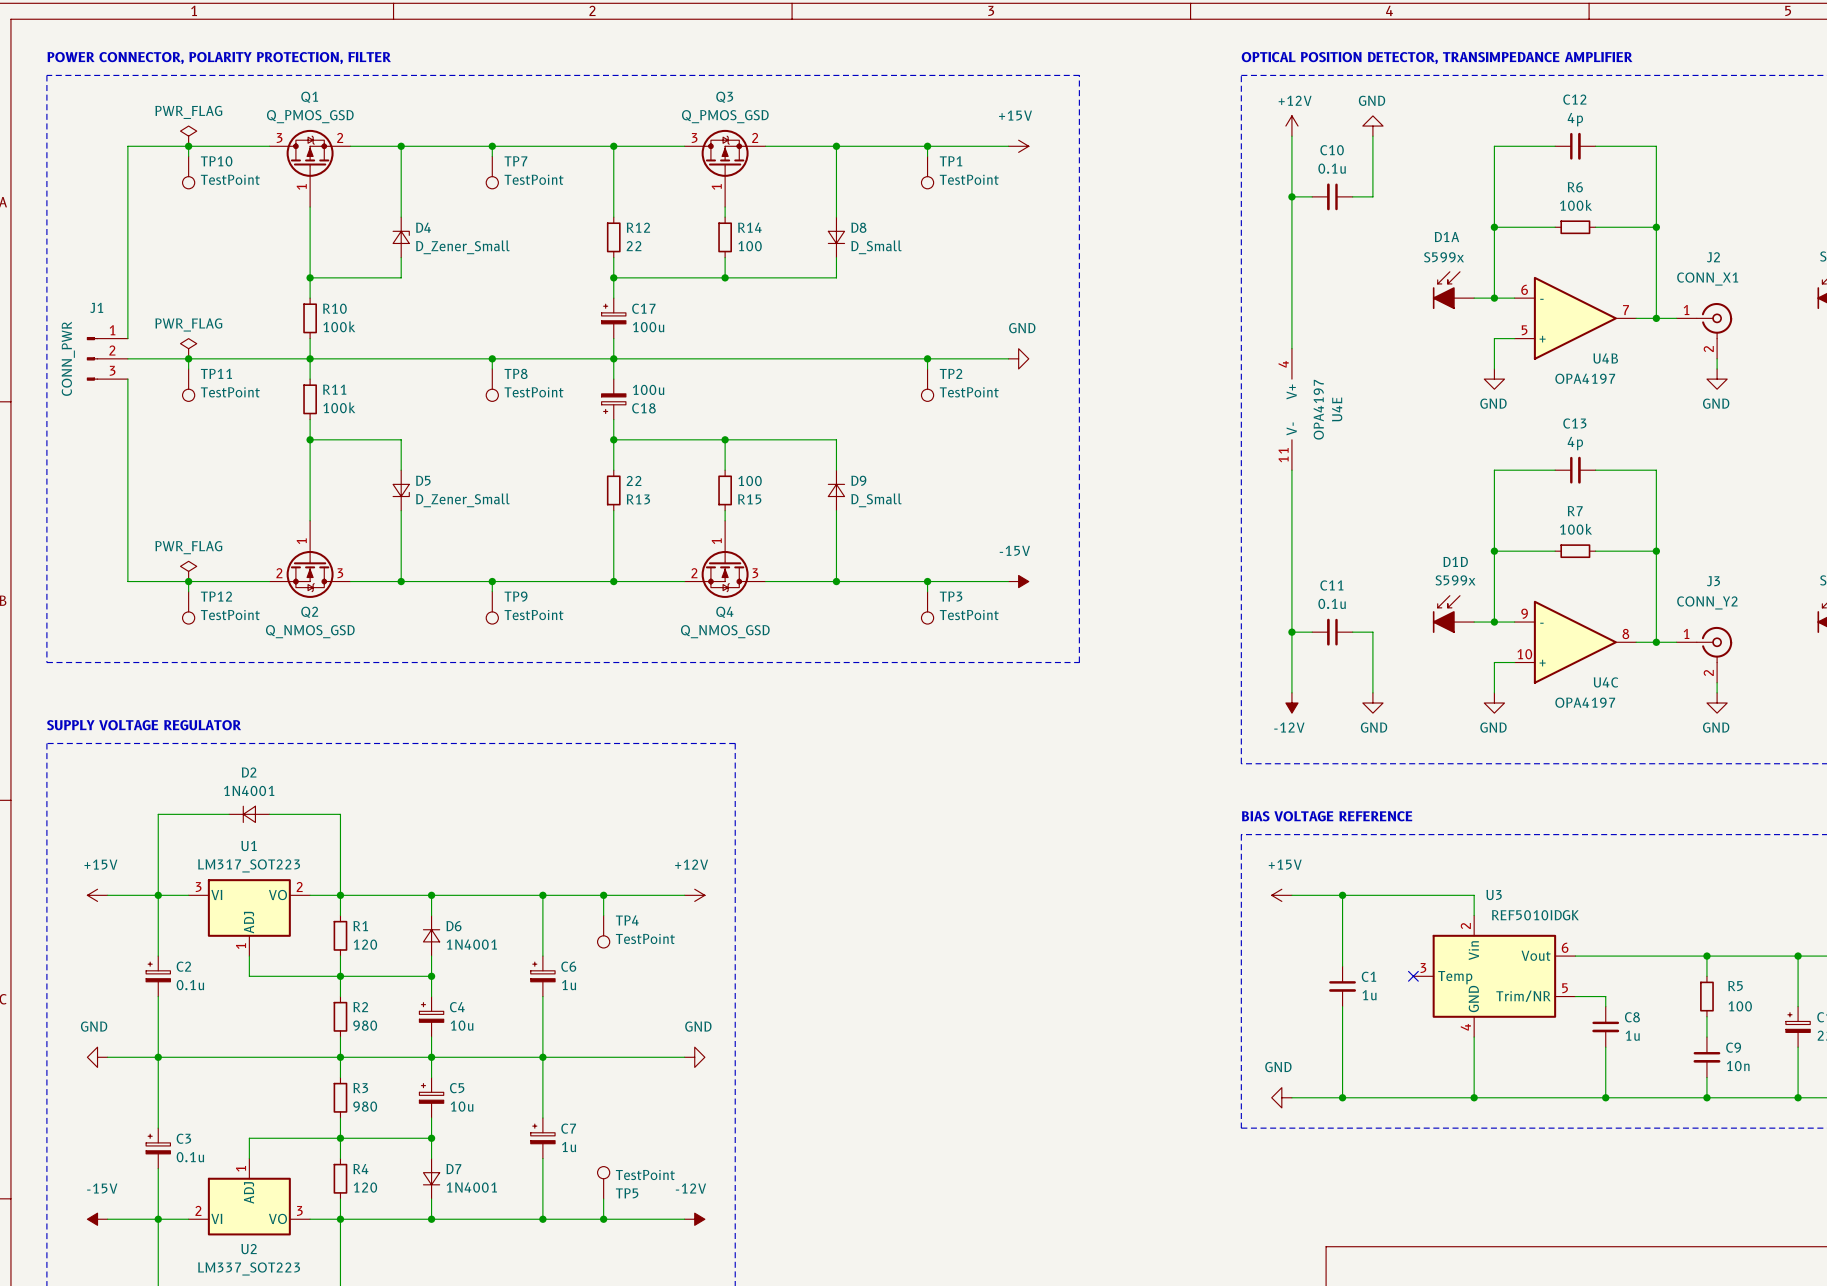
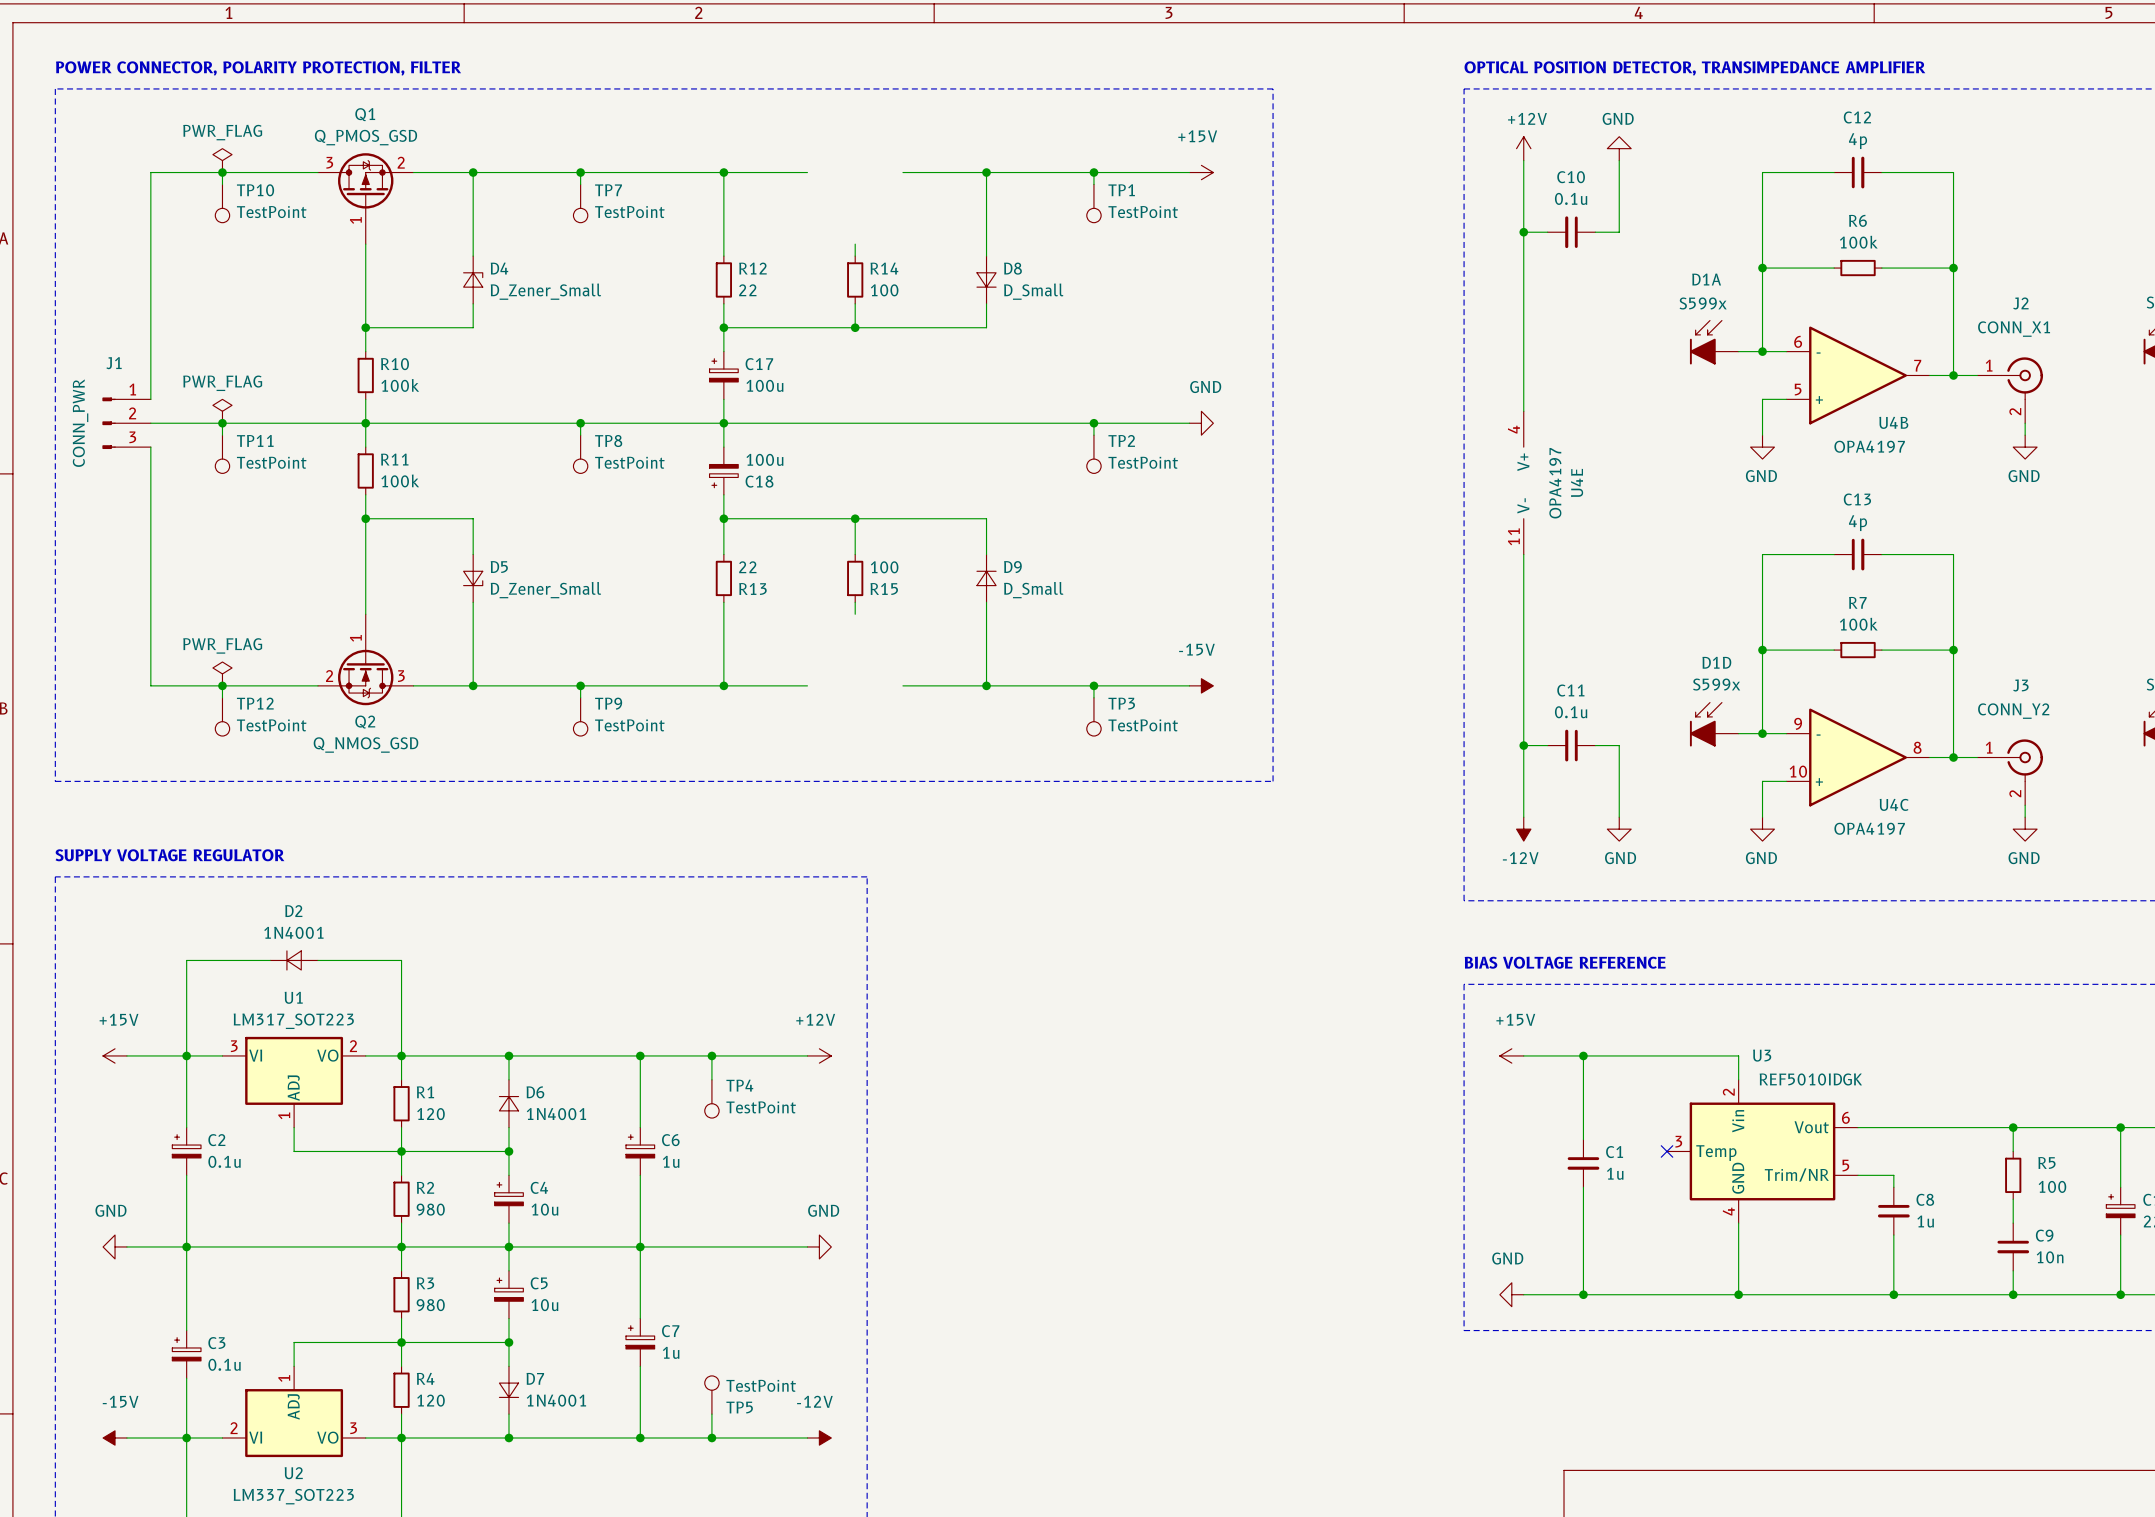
Q3: Q_PMOS_GSD (725, 168) -> none
Q4: Q_NMOS_GSD (725, 559) -> none

